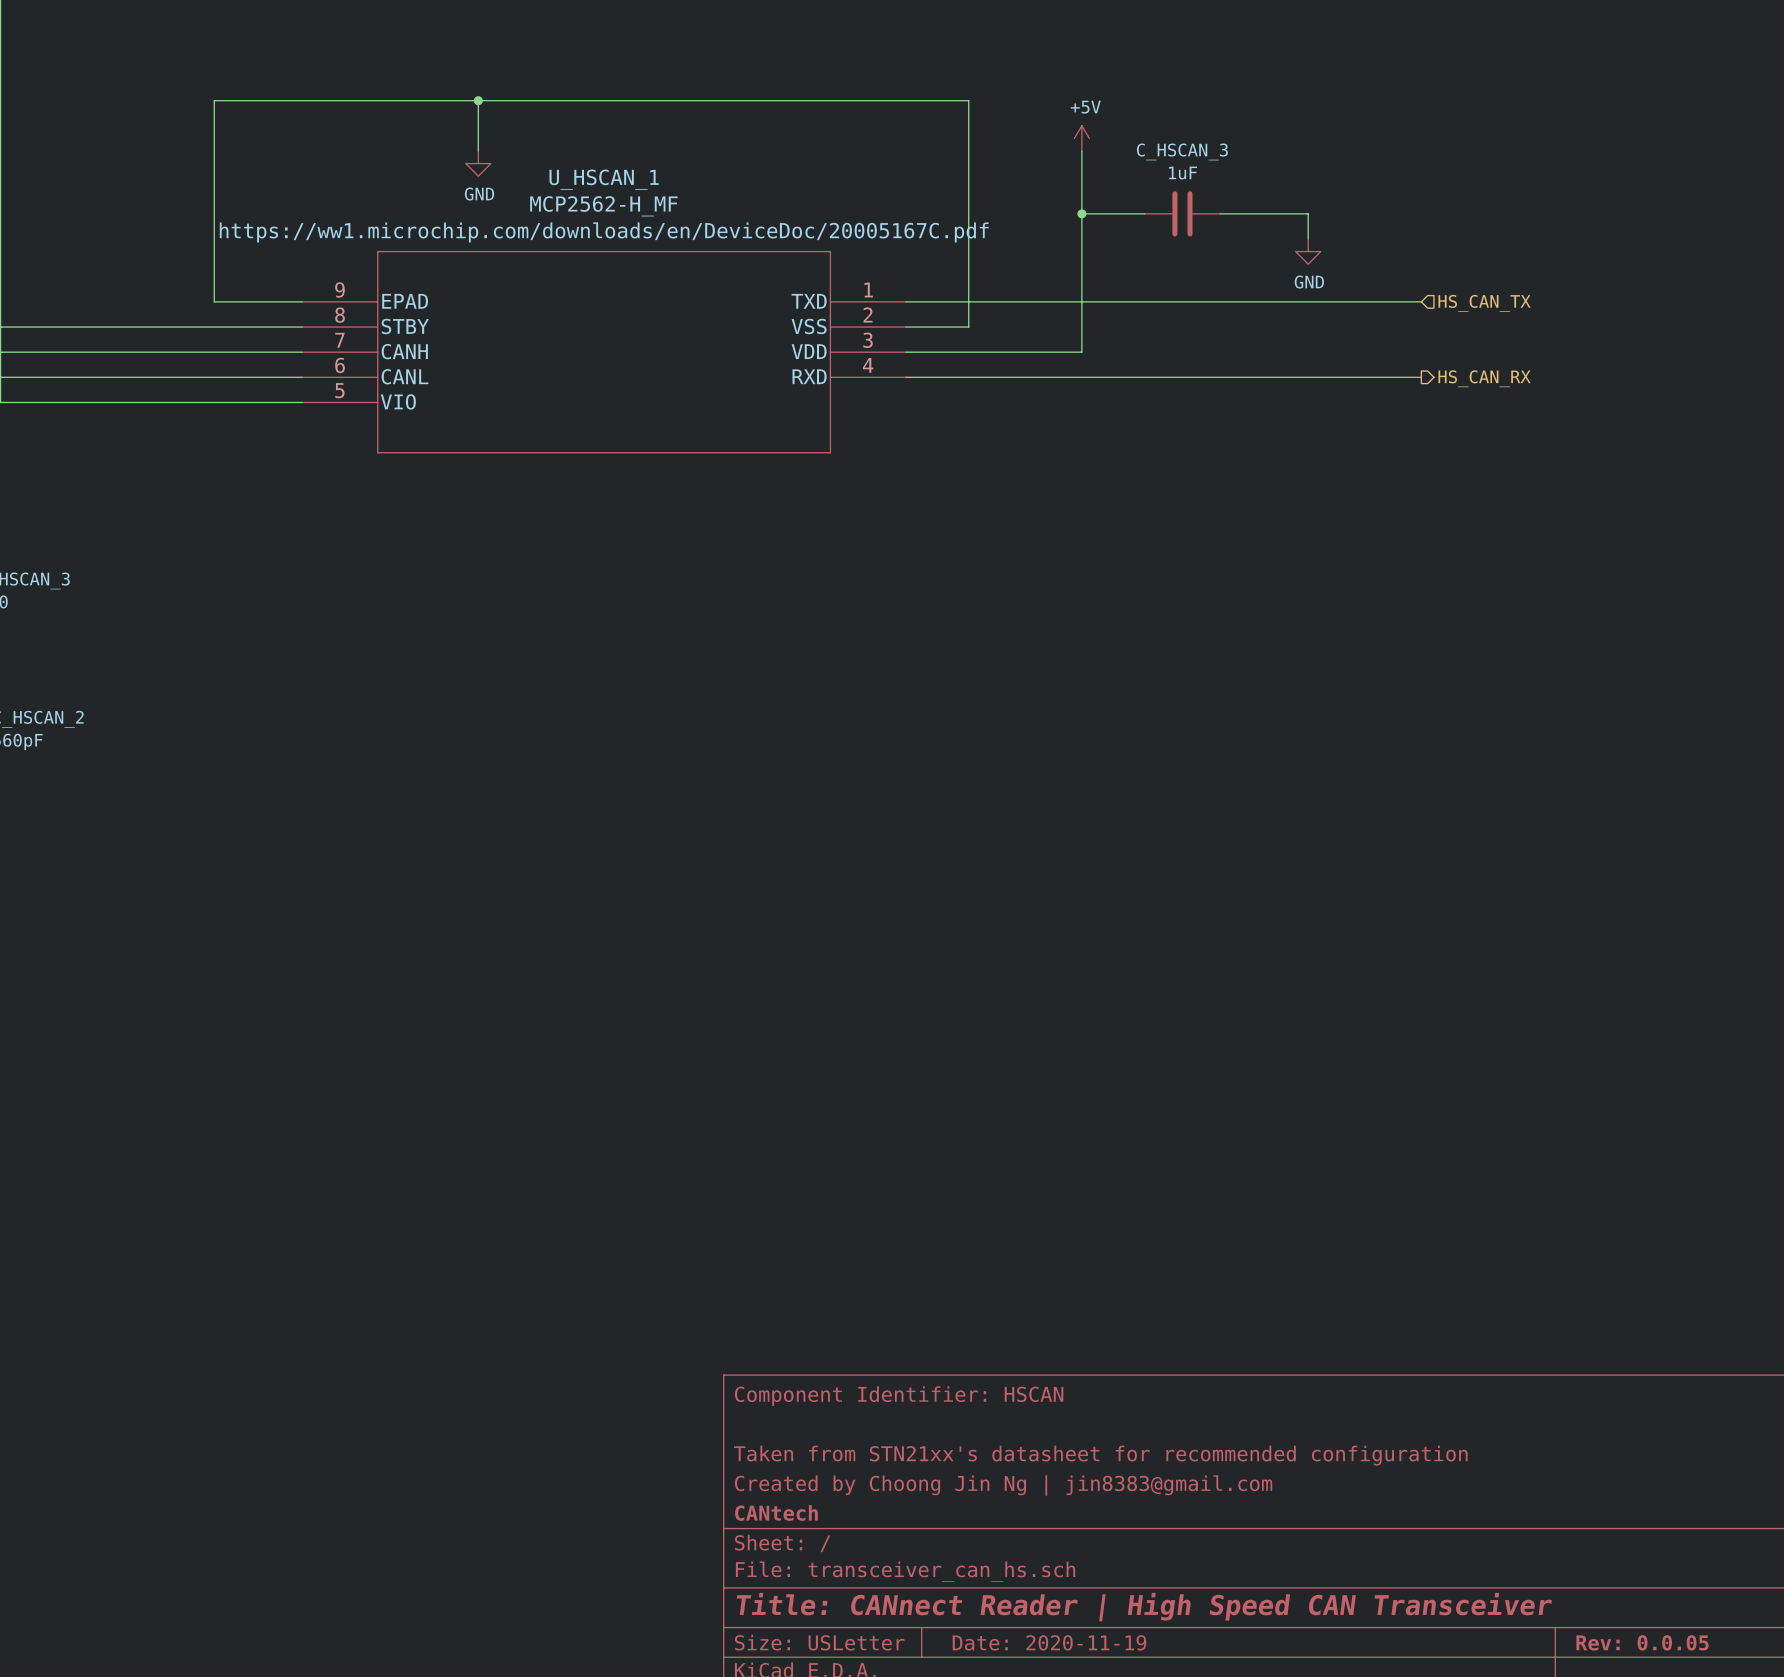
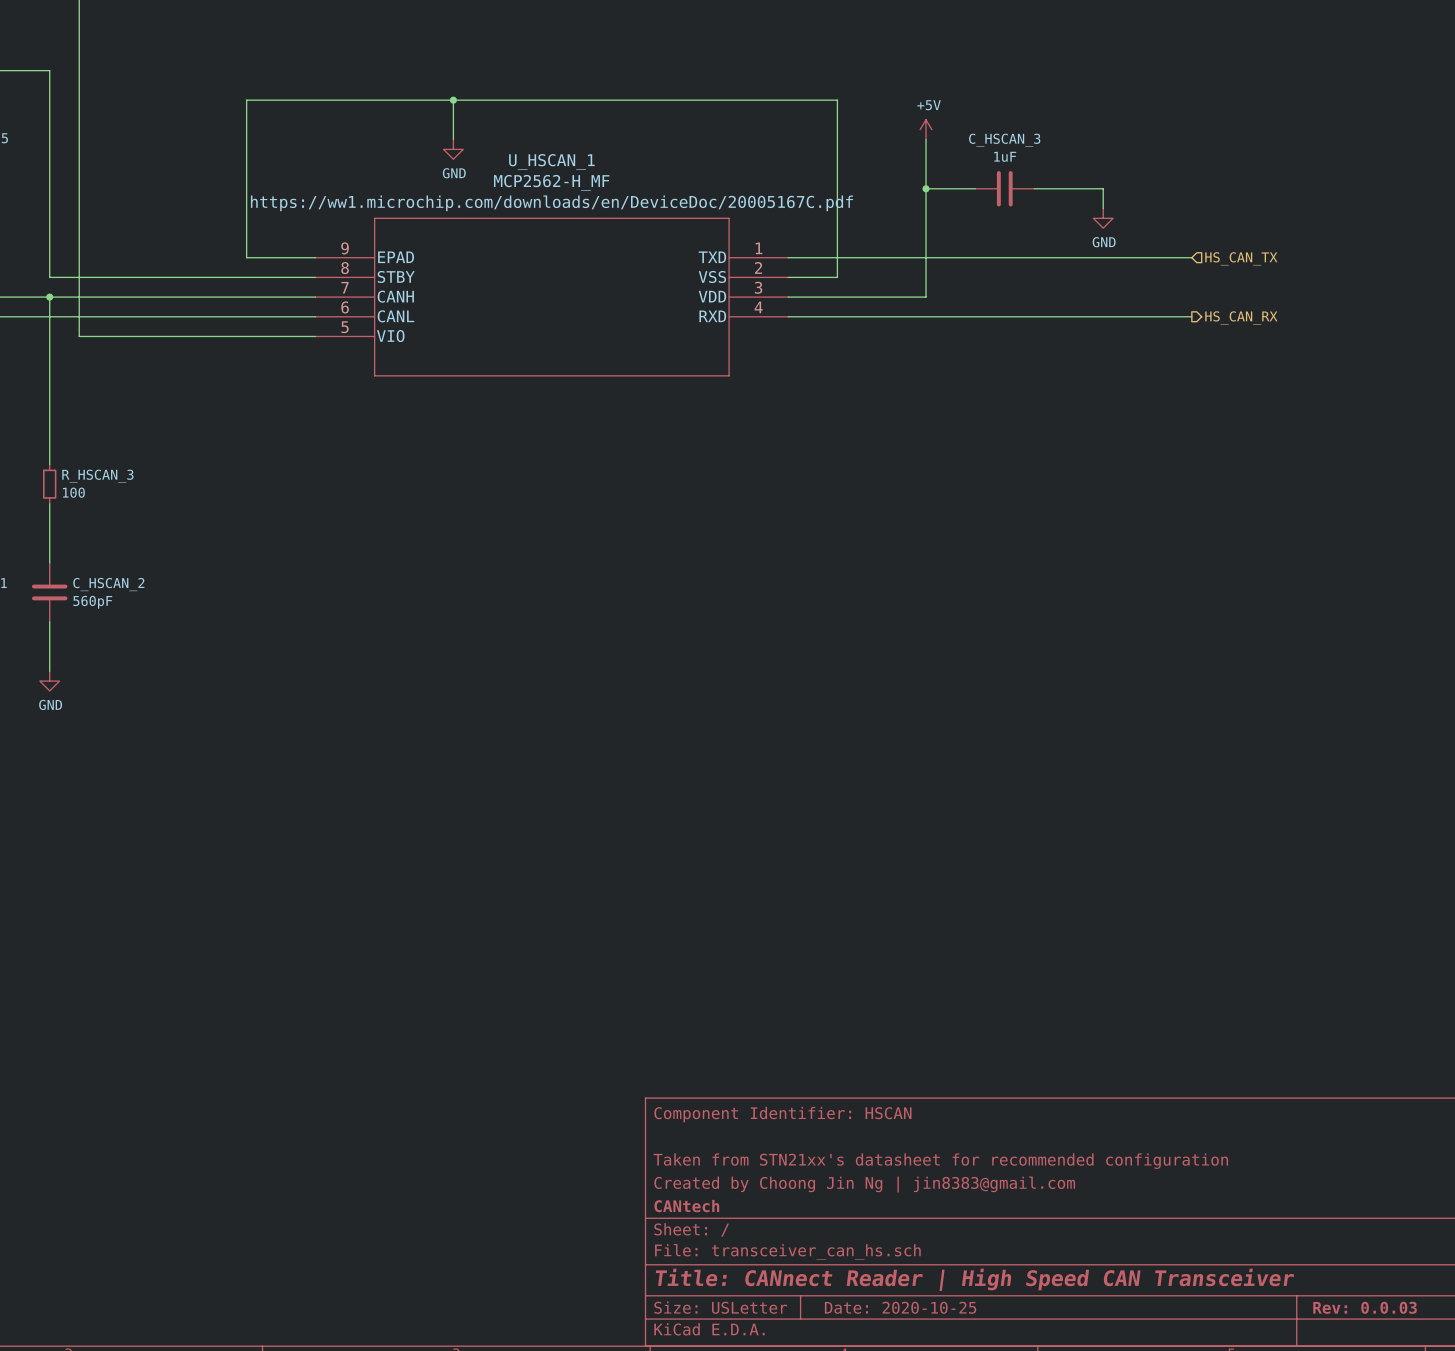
title block: Date: 2020-11-19 (1049, 1642) -> Date: 2020-10-25 (900, 1307)
title block: Rev: 0.0.05 (1642, 1642) -> Rev: 0.0.03 (1365, 1307)

